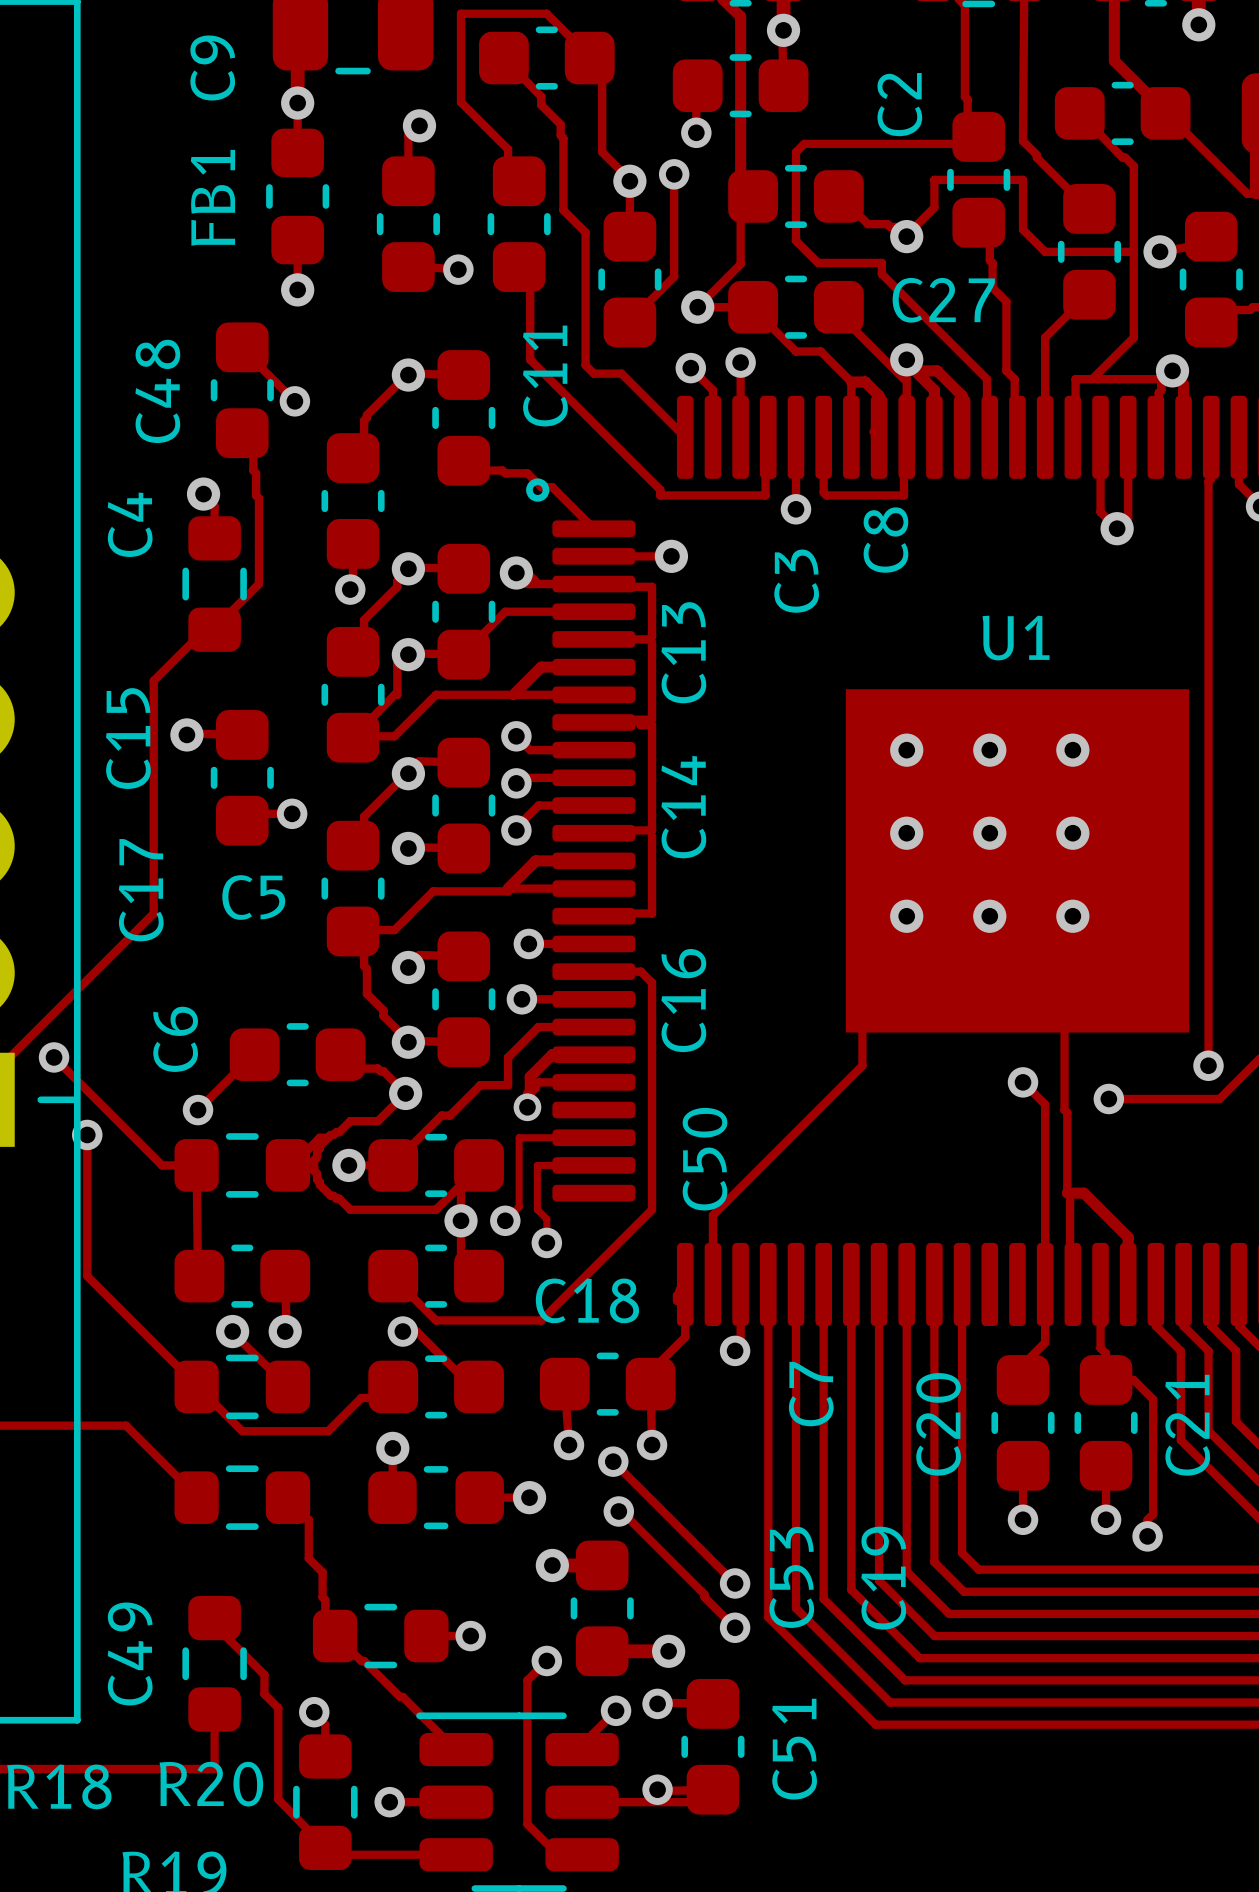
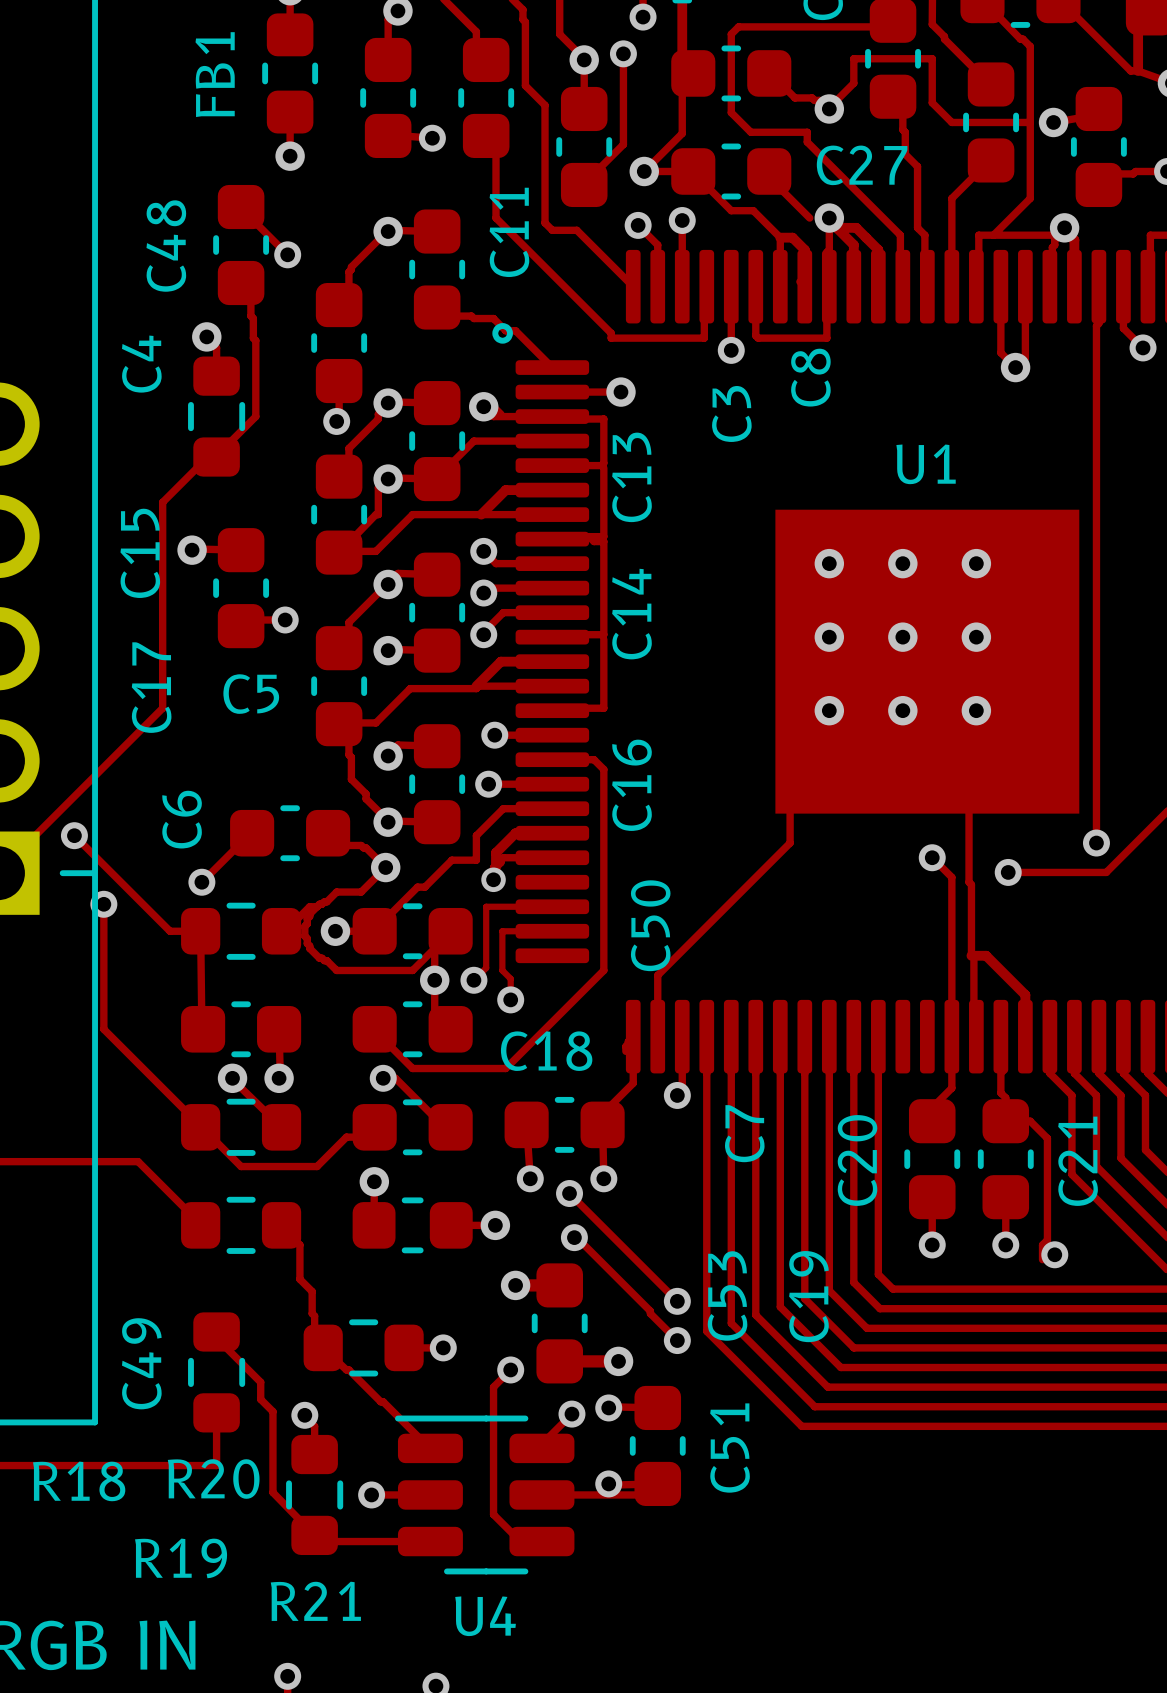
track: (884, 359) (903, 379) -> none
via position: (1147, 1536) -> (1054, 1254)

